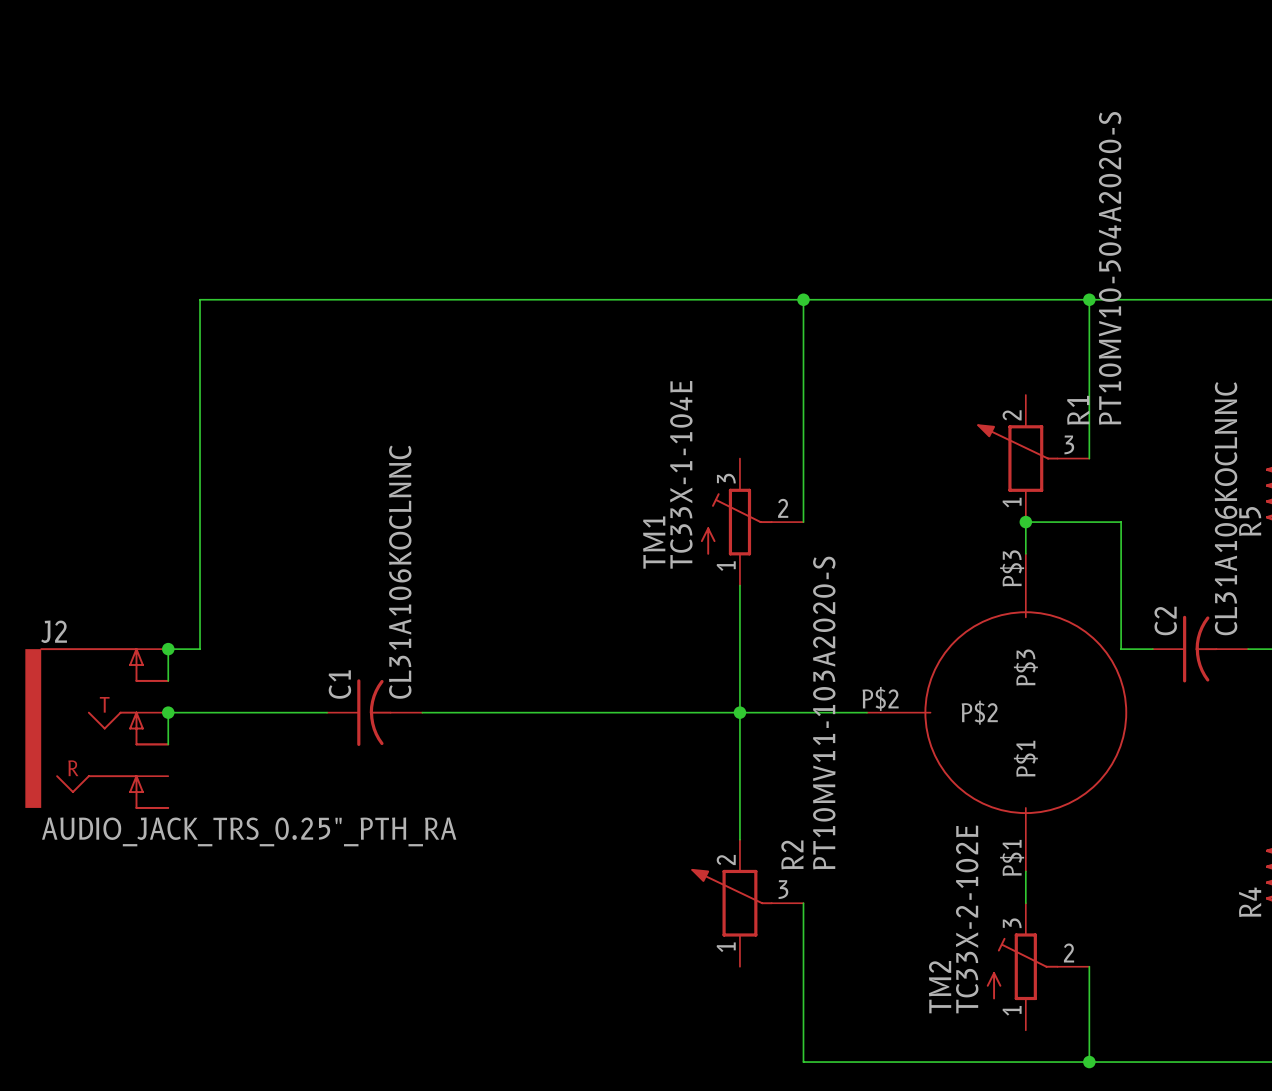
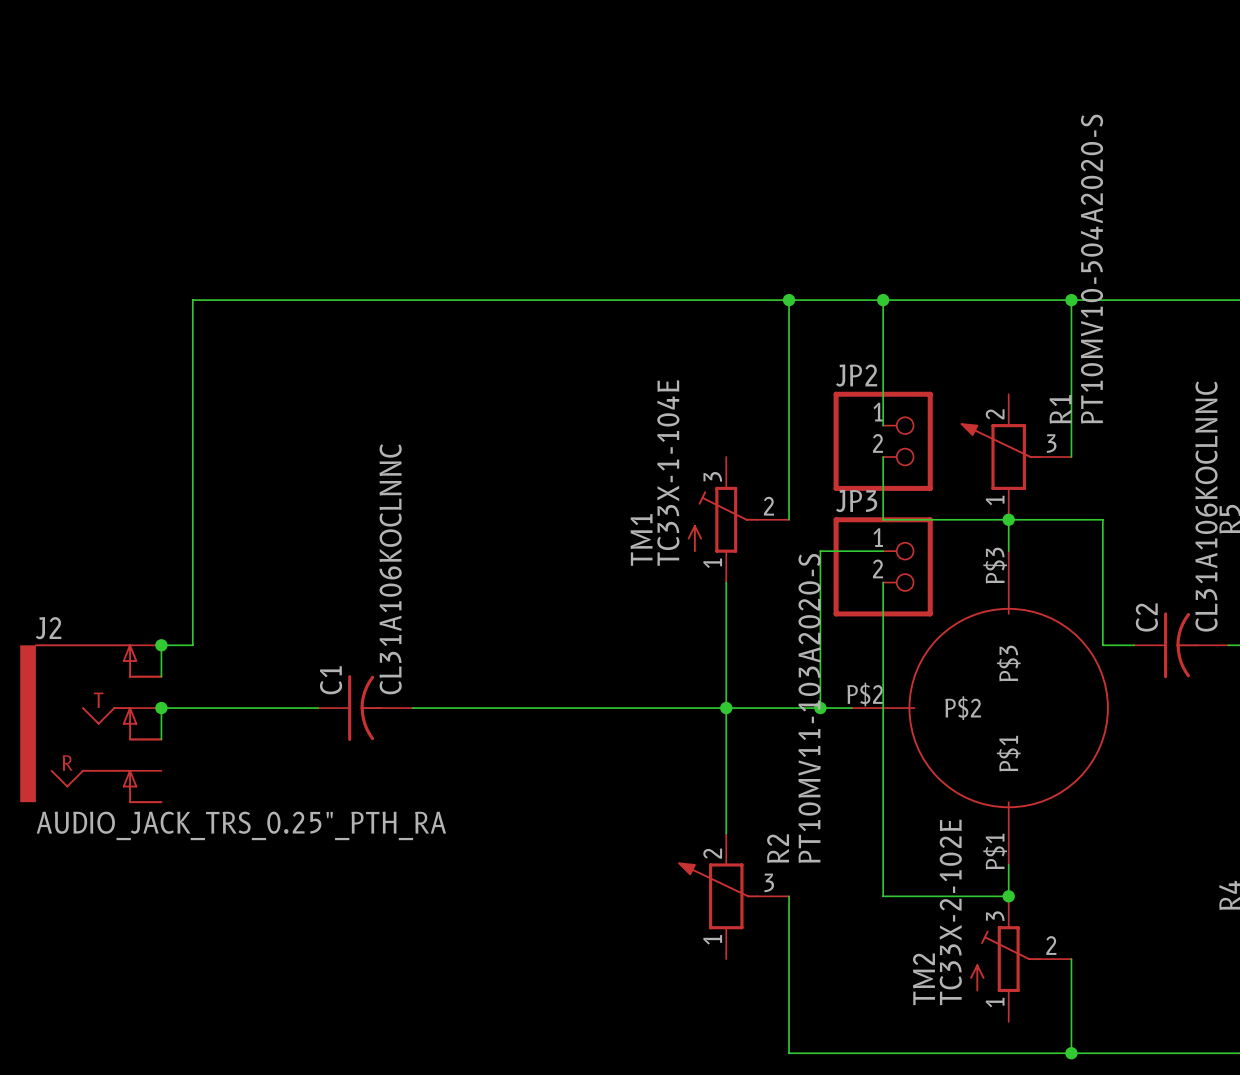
wire: none -> (883, 300) (883, 425)
junction: none -> (883, 300)
JP2: none -> (883, 441)
wire: none -> (883, 457) (883, 519) (1008, 519)
wire: none -> (883, 551) (820, 551) (820, 708)
JP3: none -> (883, 566)
wire: none -> (883, 582) (883, 896) (1008, 896)
junction: none -> (820, 708)
junction: none -> (1008, 896)

